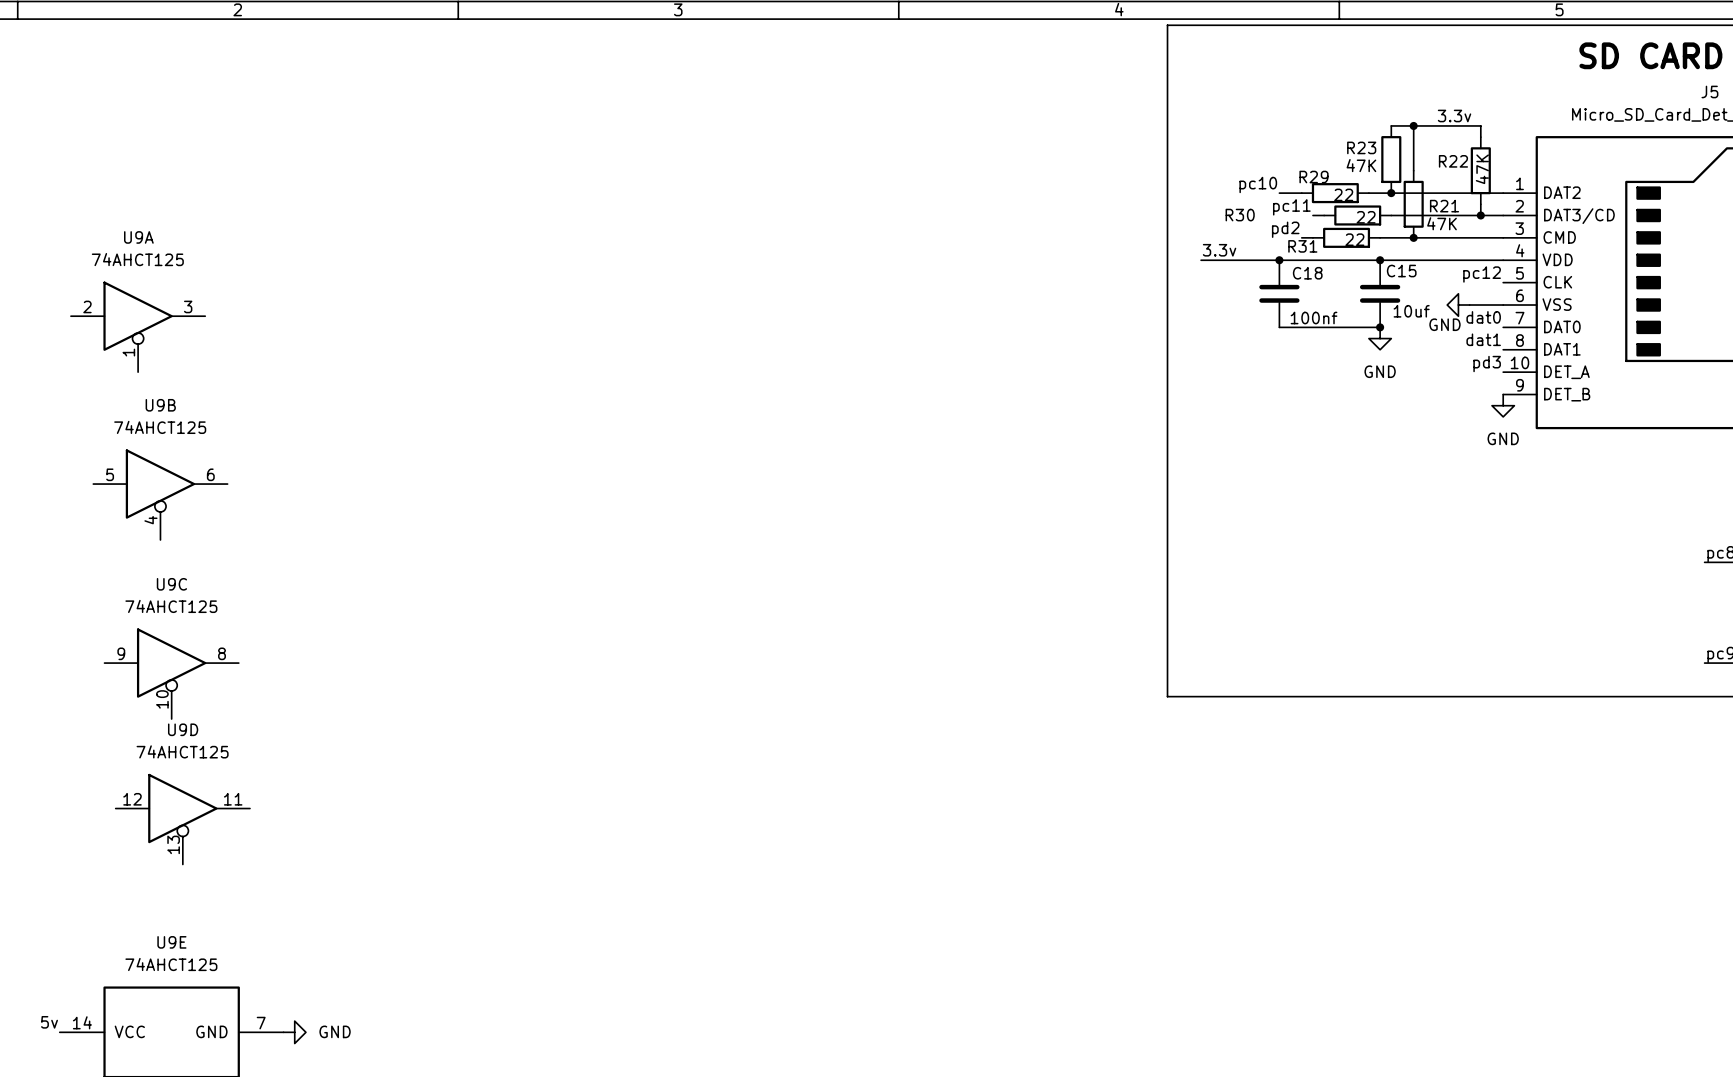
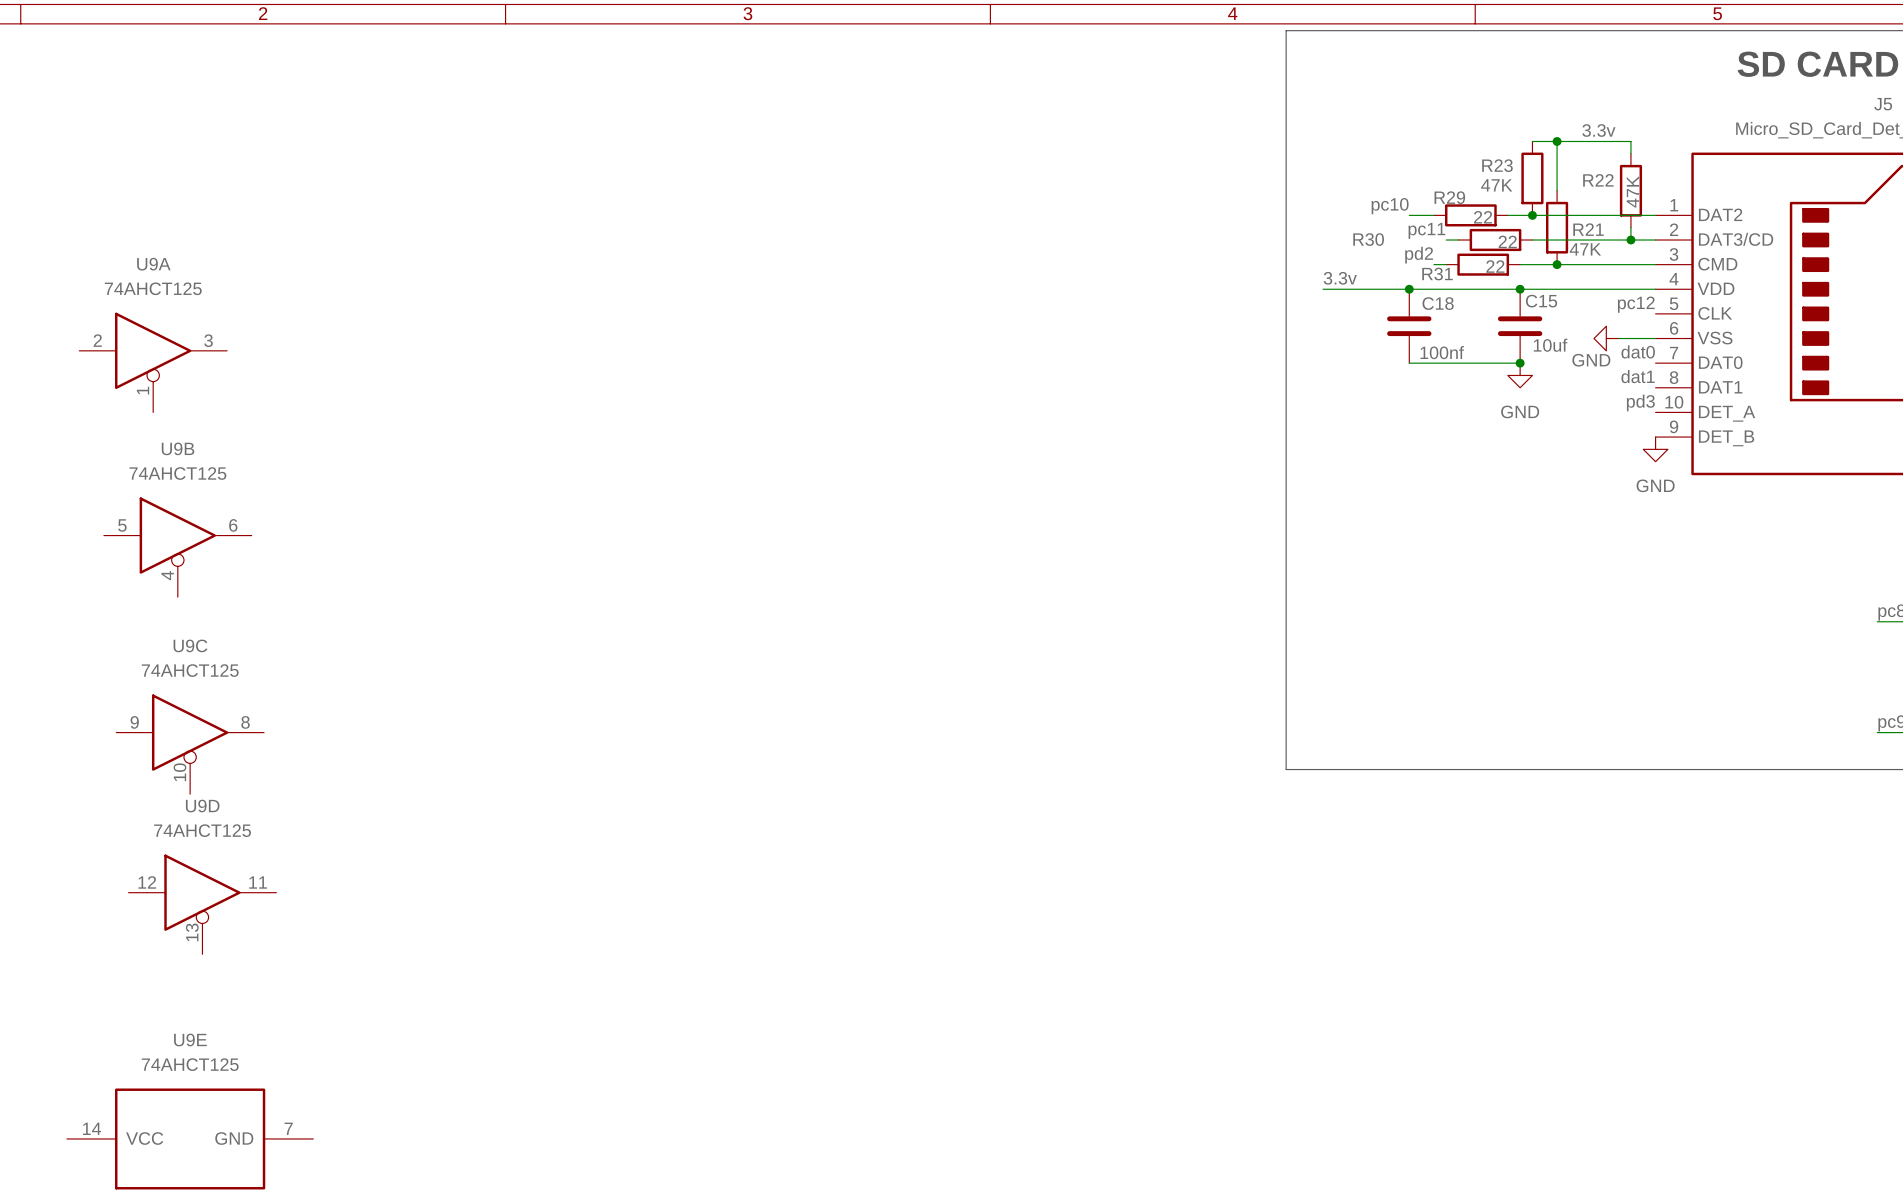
label: 5v (49, 1022) -> none
power symbol: GND (294, 1032) -> none

